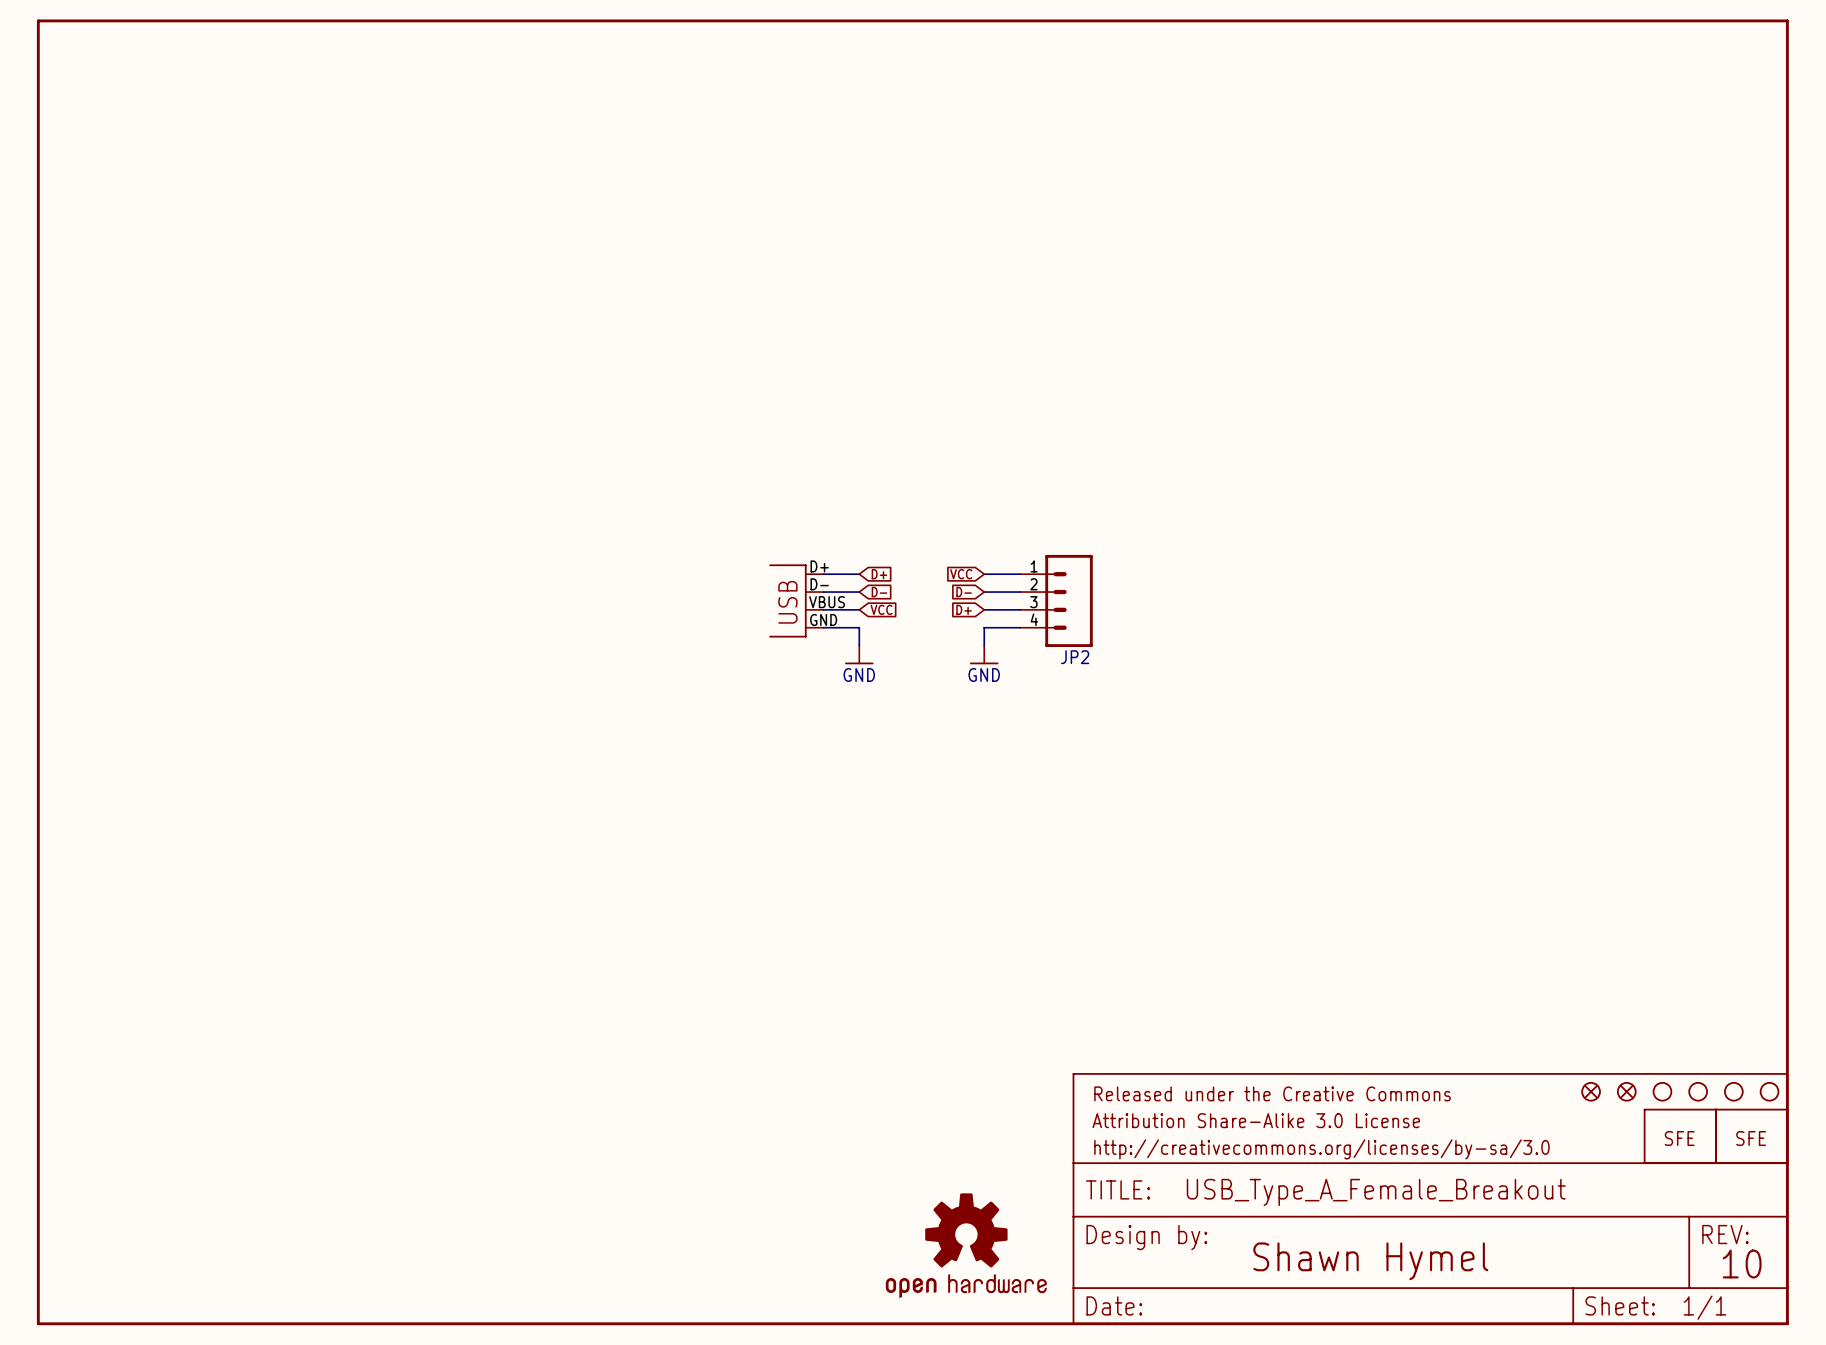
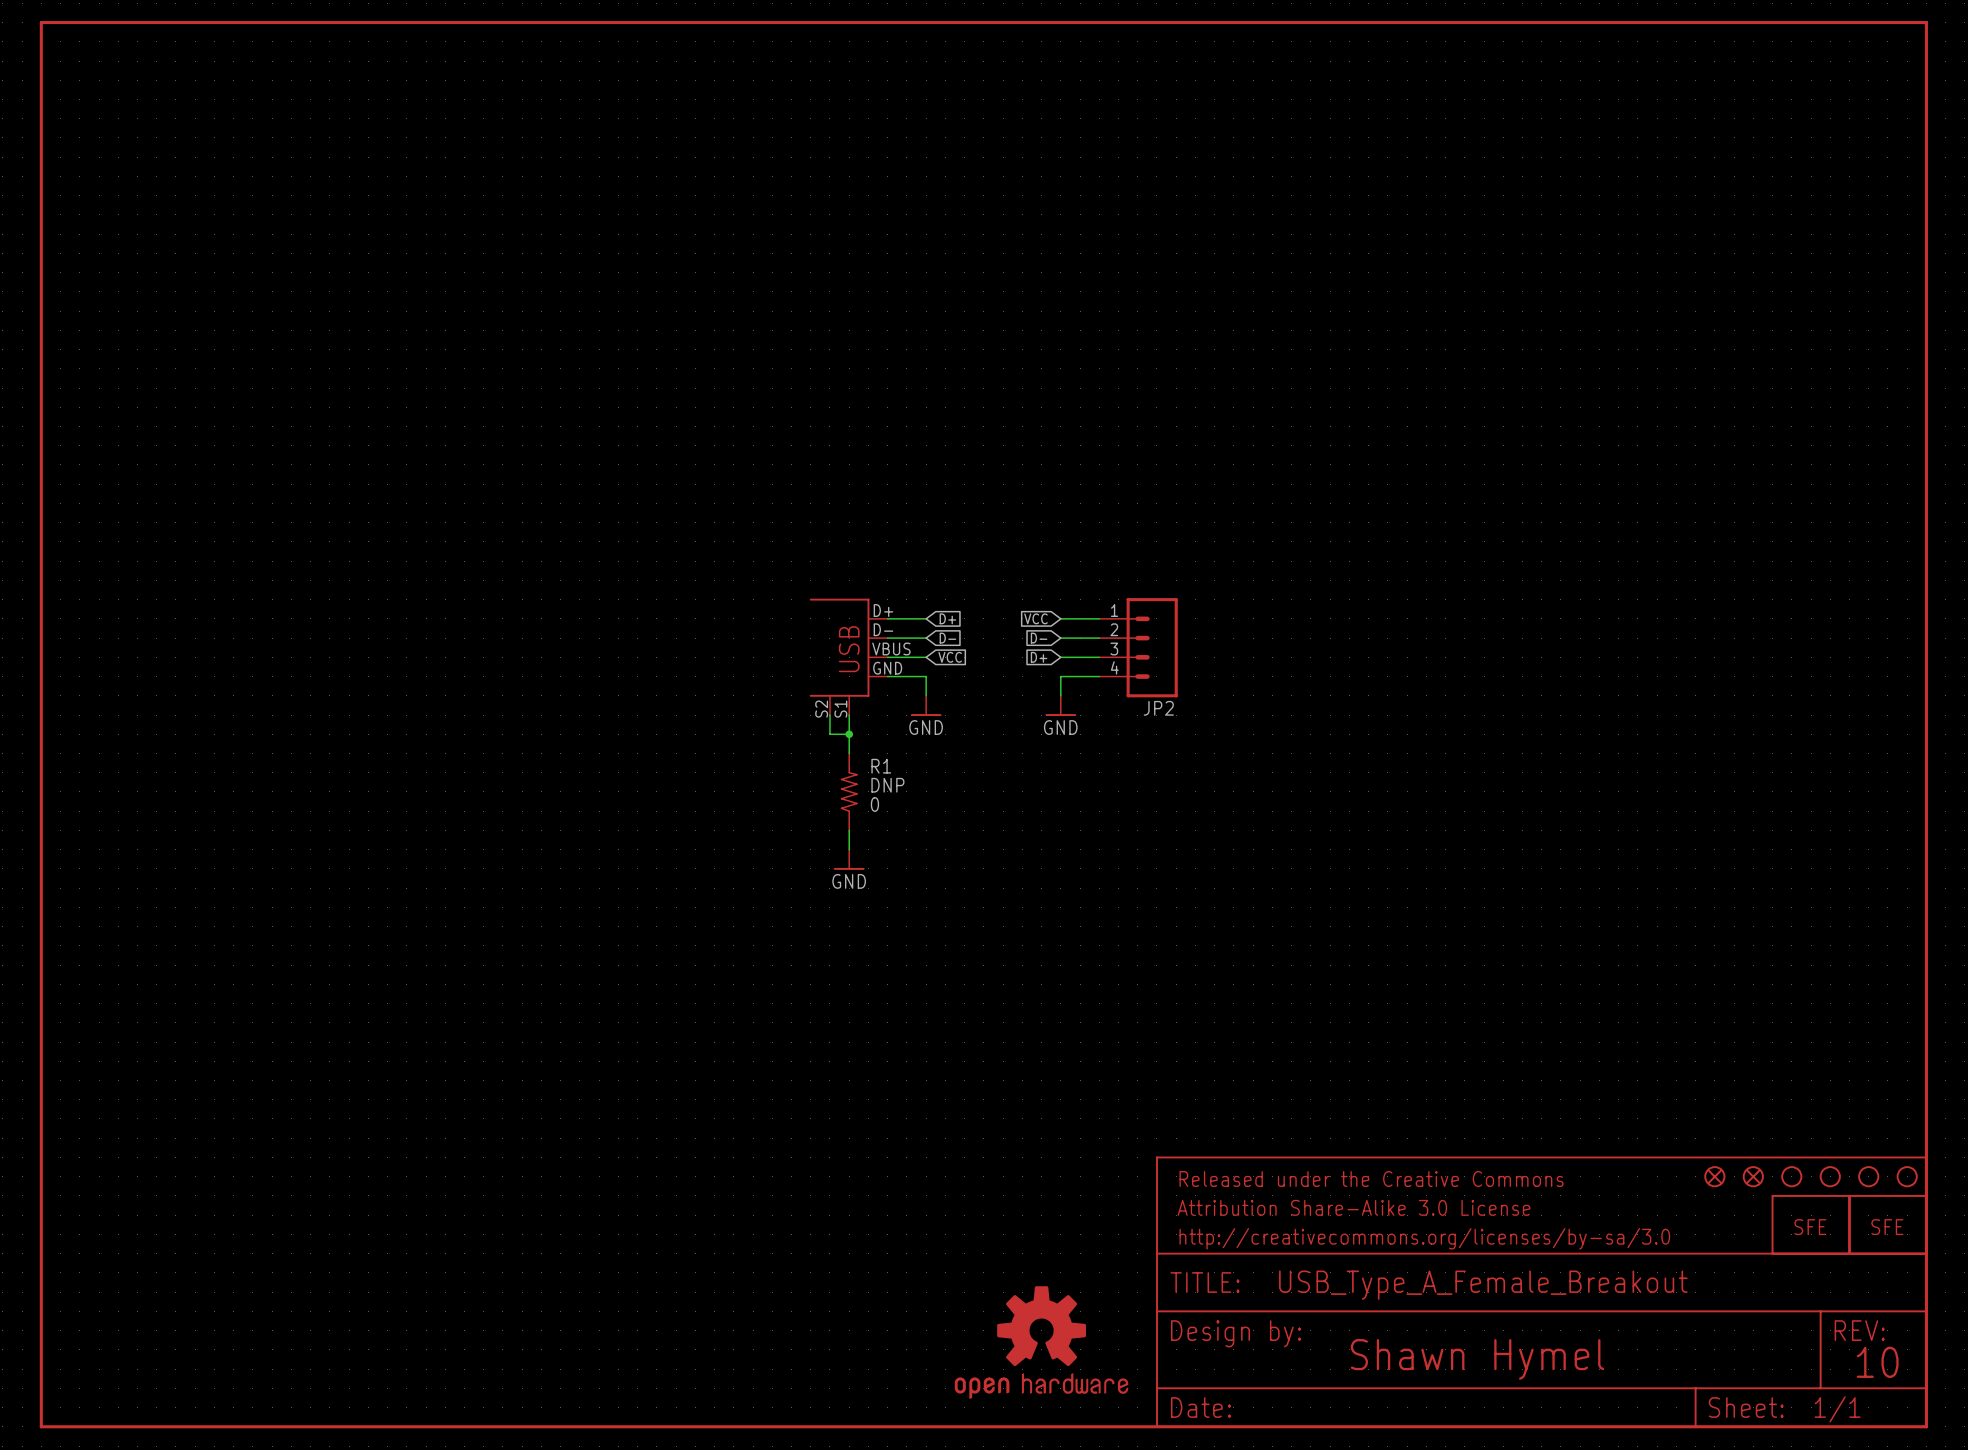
part: (796, 600) -> none
part: none -> (848, 656)
wire: none -> (829, 715) (829, 734) (849, 734)
wire: none -> (849, 715) (849, 753)
junction: none -> (849, 734)
R1: none -> 0 (849, 791)
wire: none -> (849, 830) (849, 849)
power symbol: none -> GND (849, 859)

